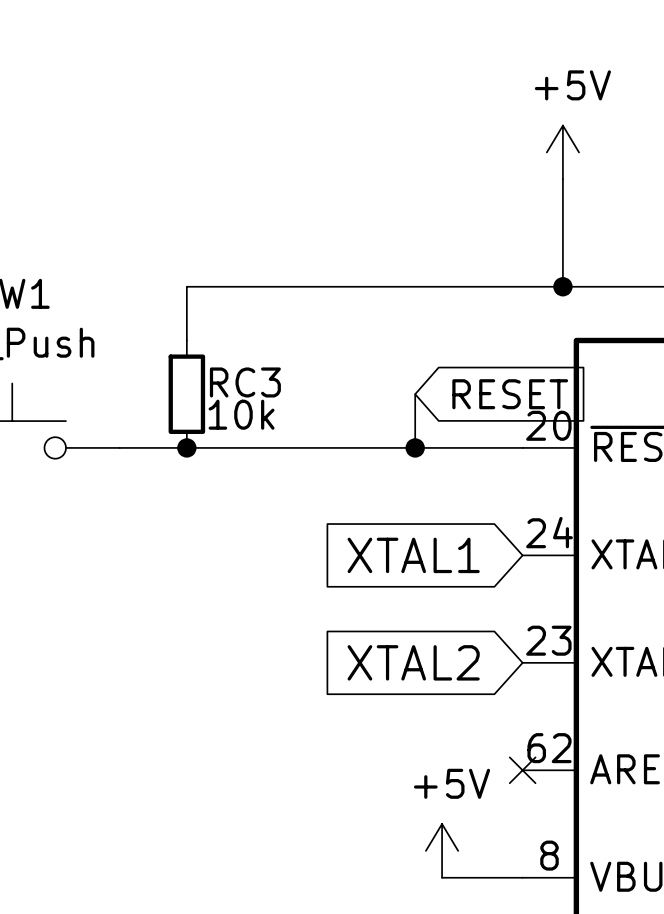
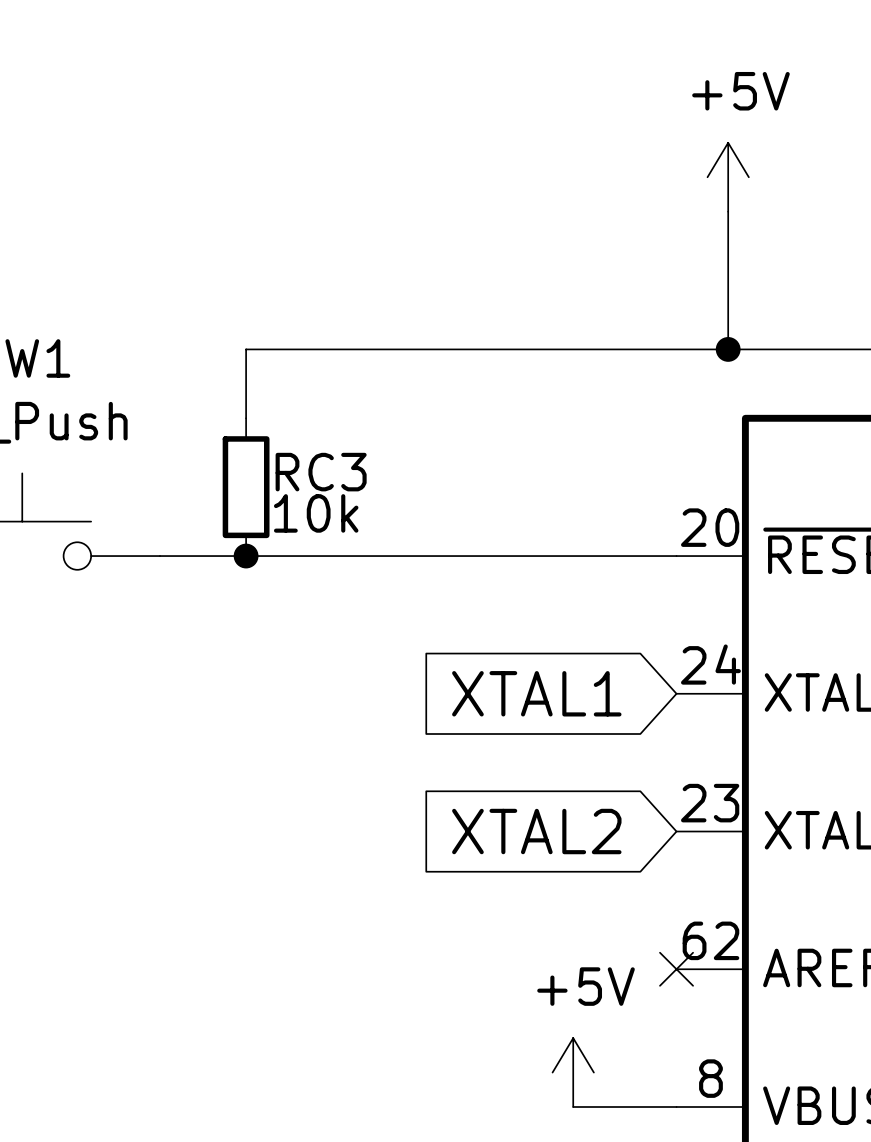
wire: (415, 394) (415, 447) -> none
global label: RESET (510, 394) -> none
junction: (415, 447) -> none

